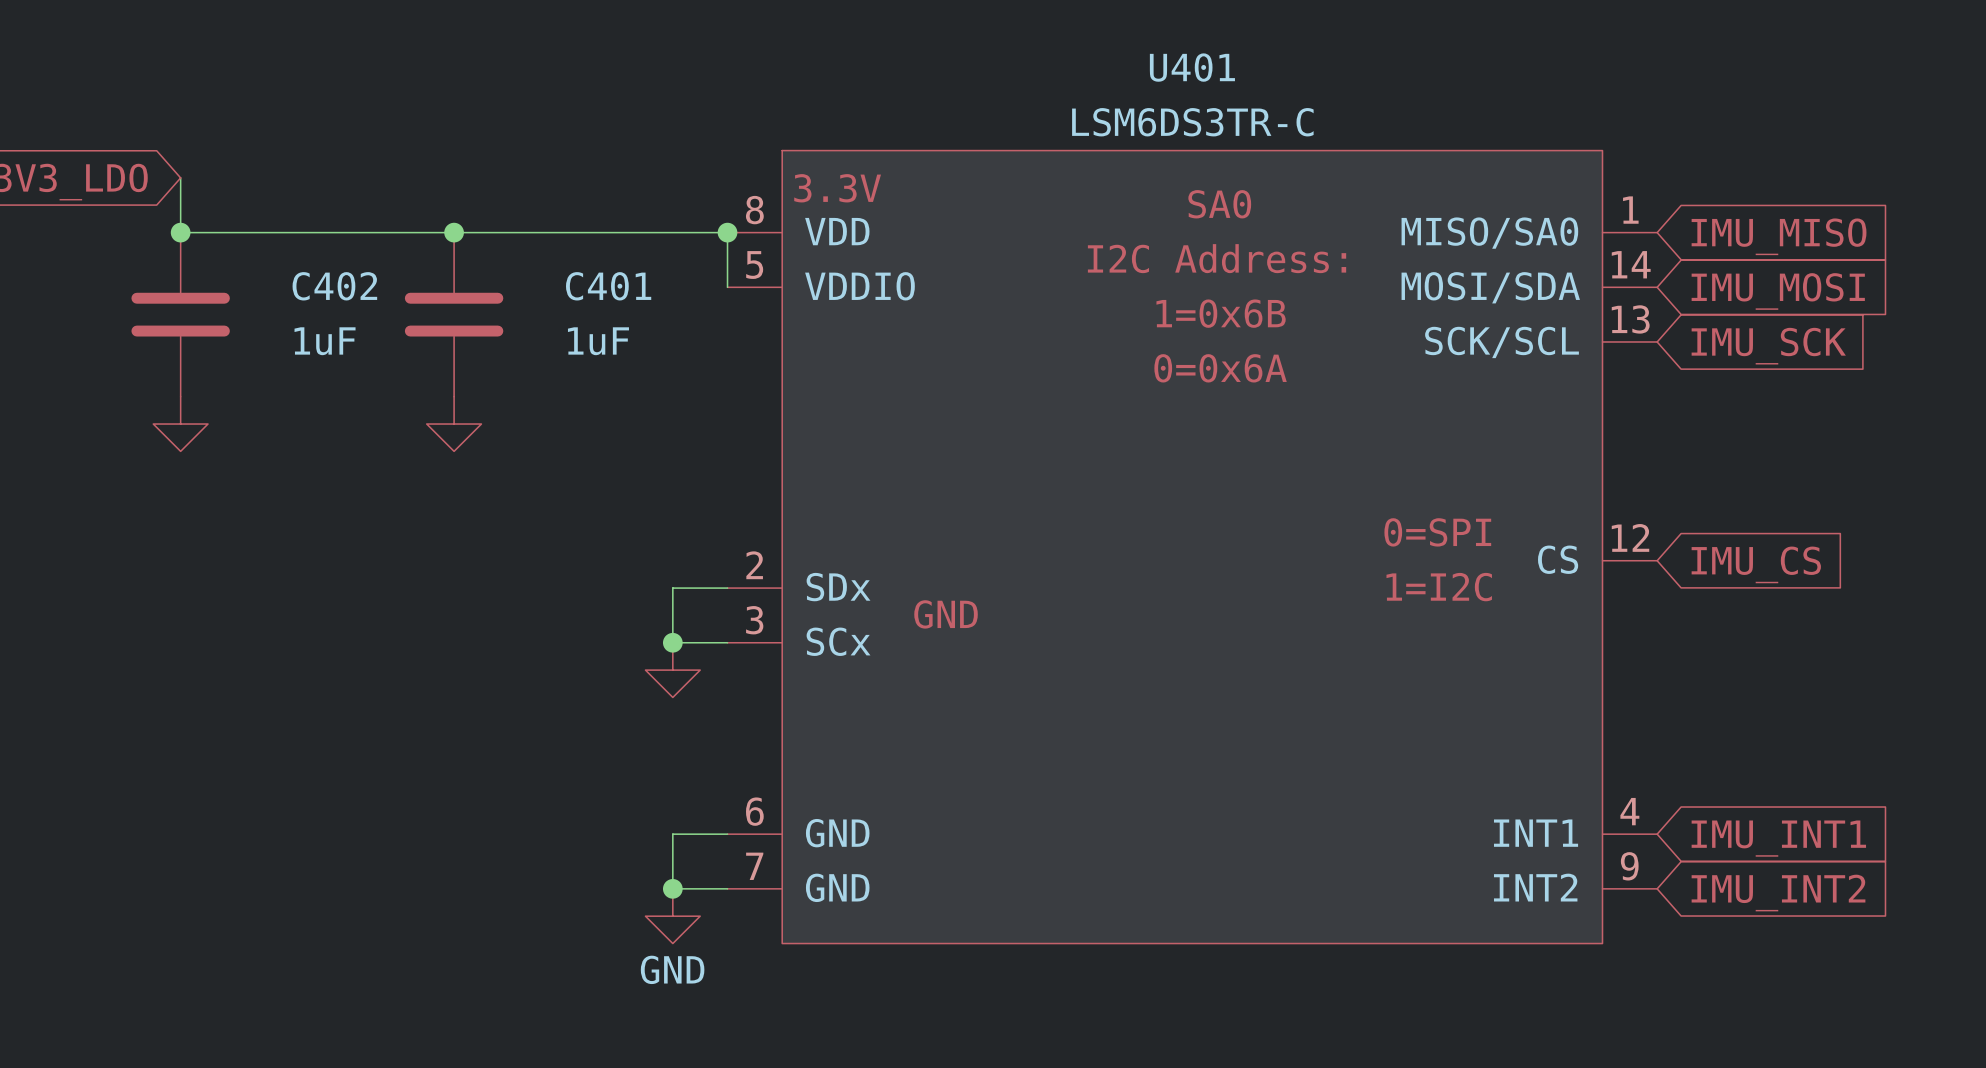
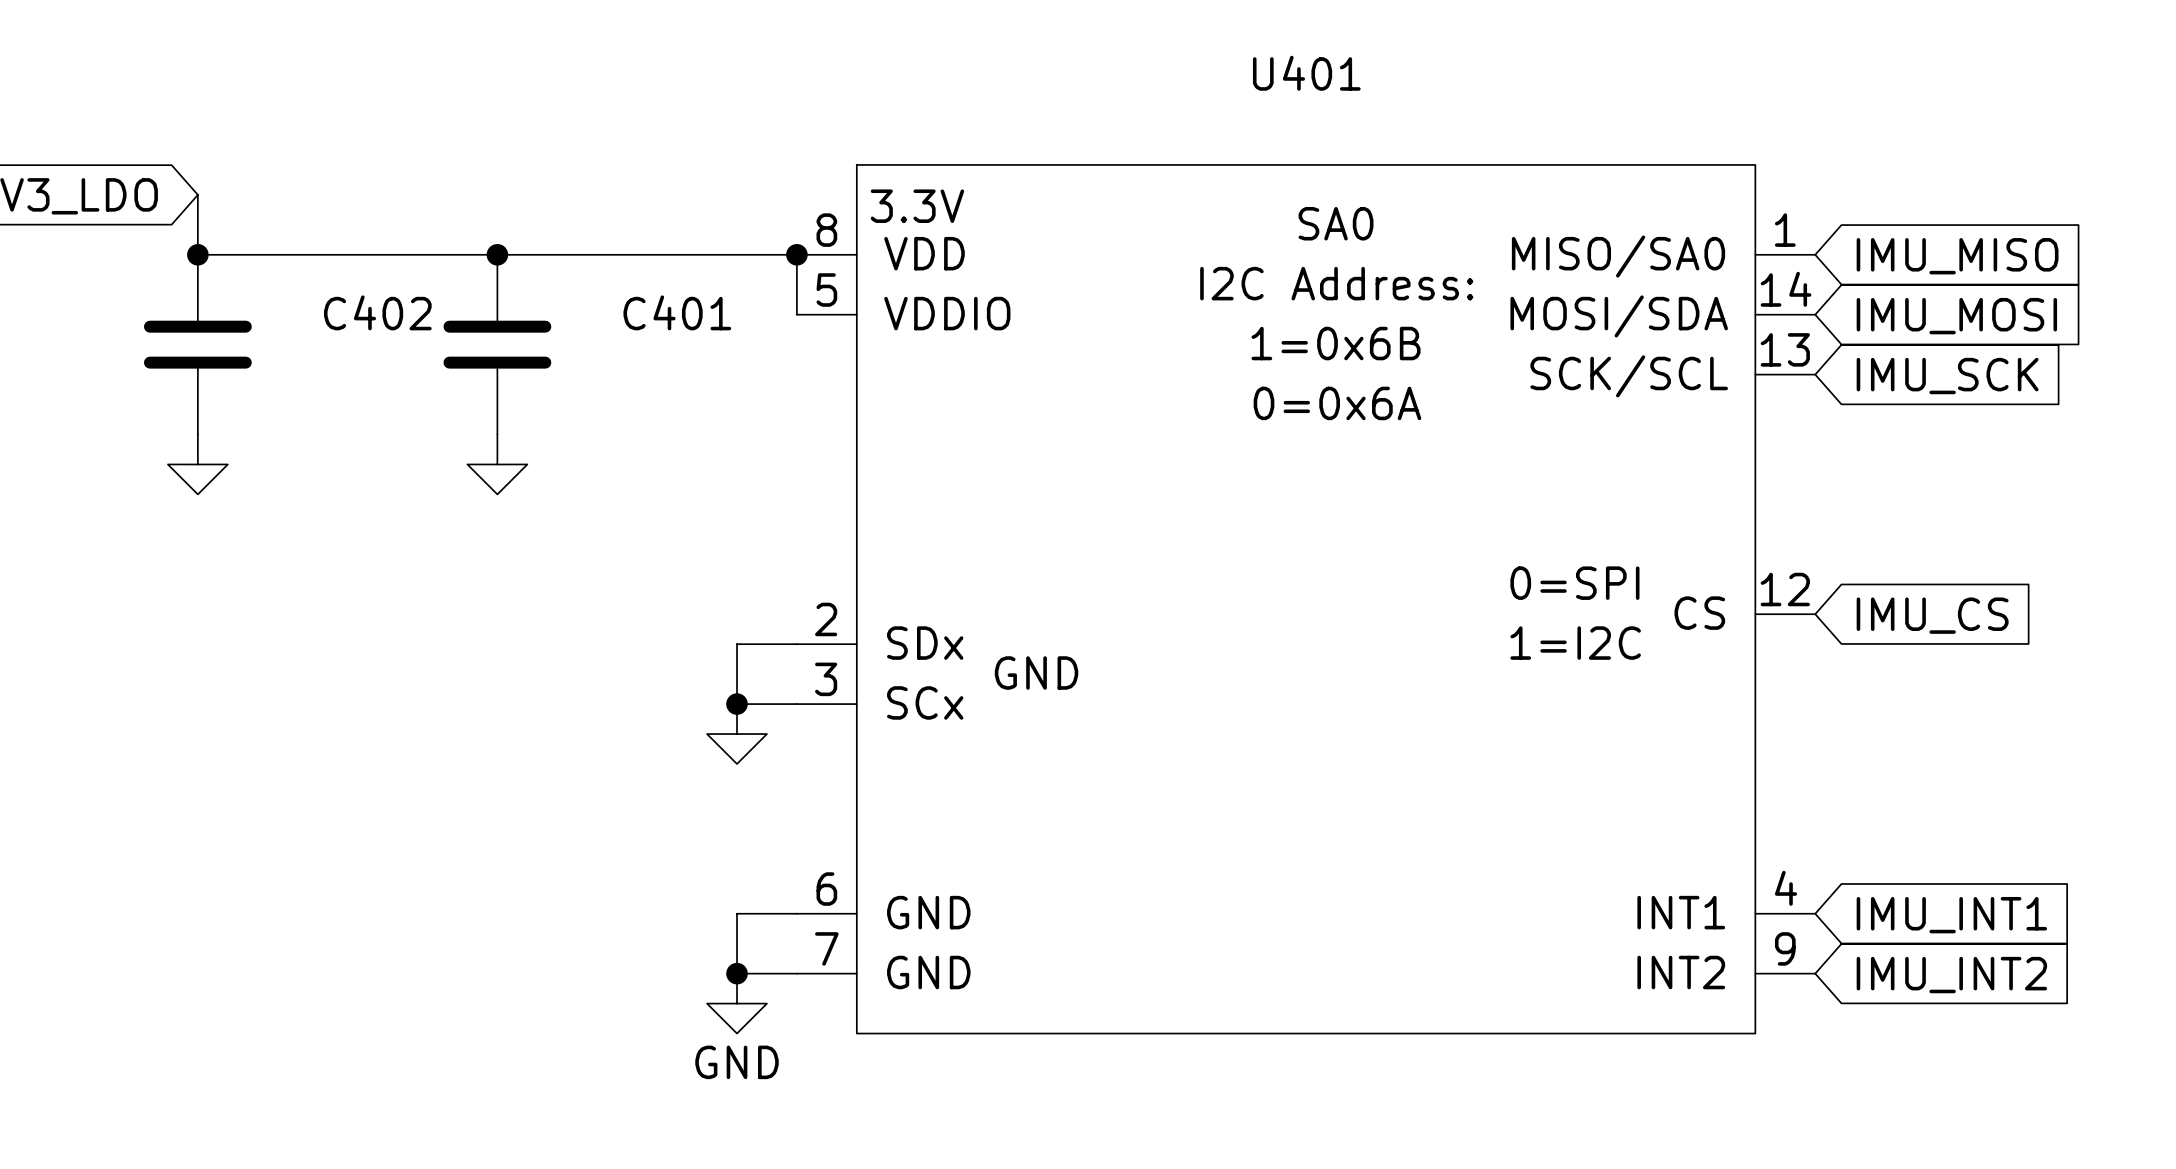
U401 value: LSM6DS3TR-C (1192, 122) -> none
C402 value: 1uF (325, 341) -> none
C401 value: 1uF (598, 341) -> none

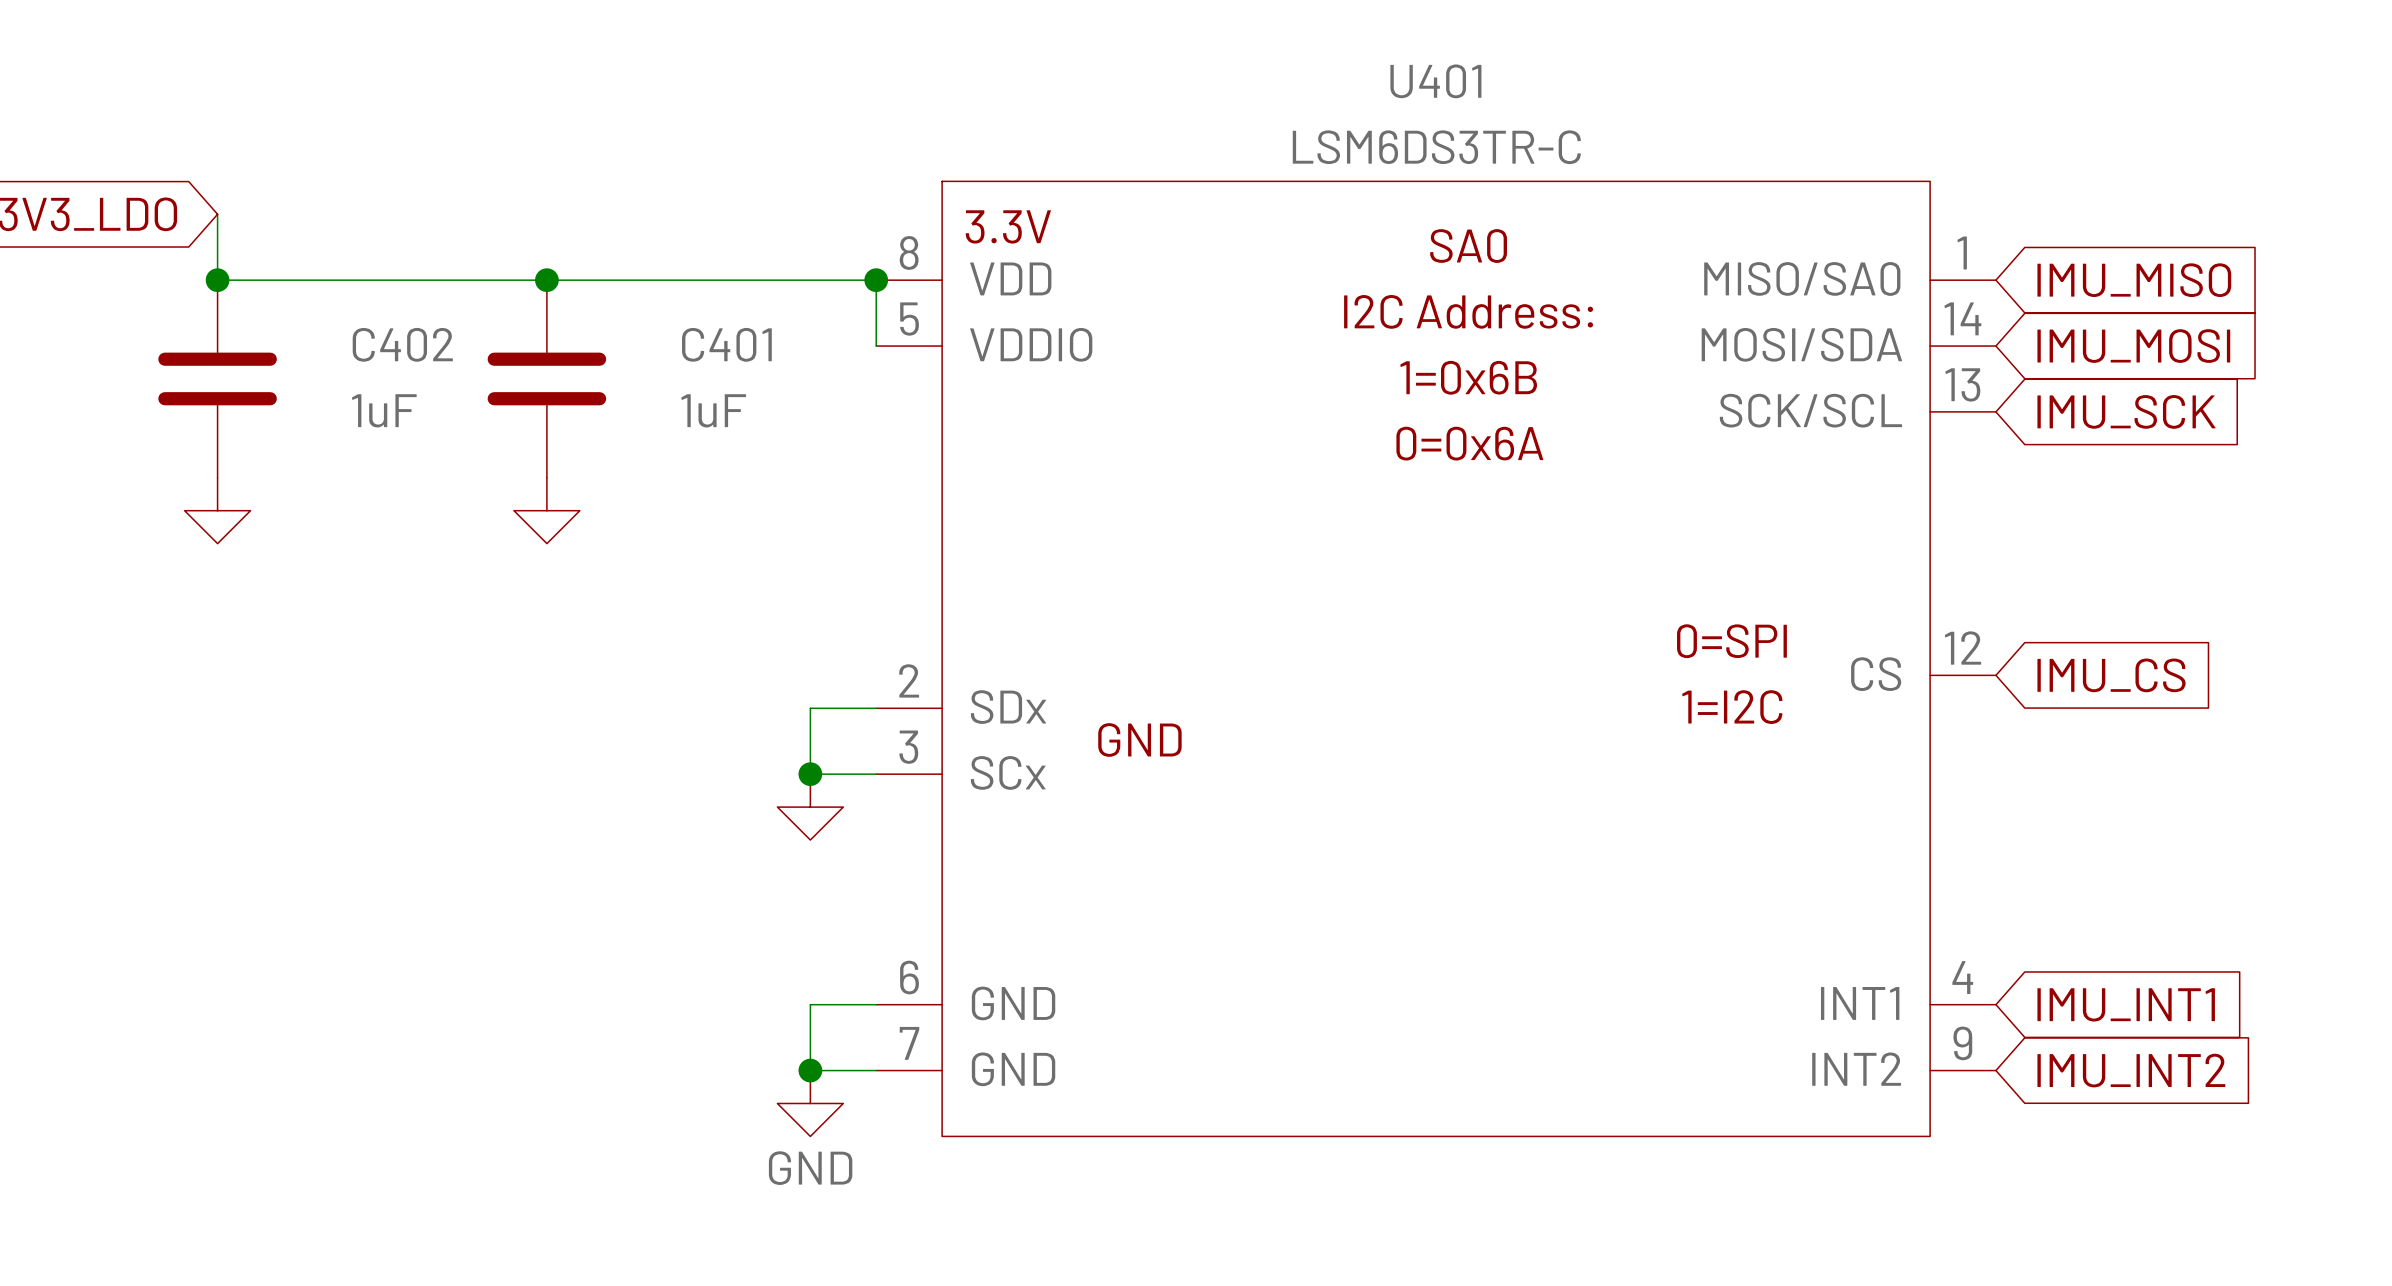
U401 value: none -> LSM6DS3TR-C (1436, 147)
C402 value: none -> 1uF (384, 410)
C401 value: none -> 1uF (713, 410)

